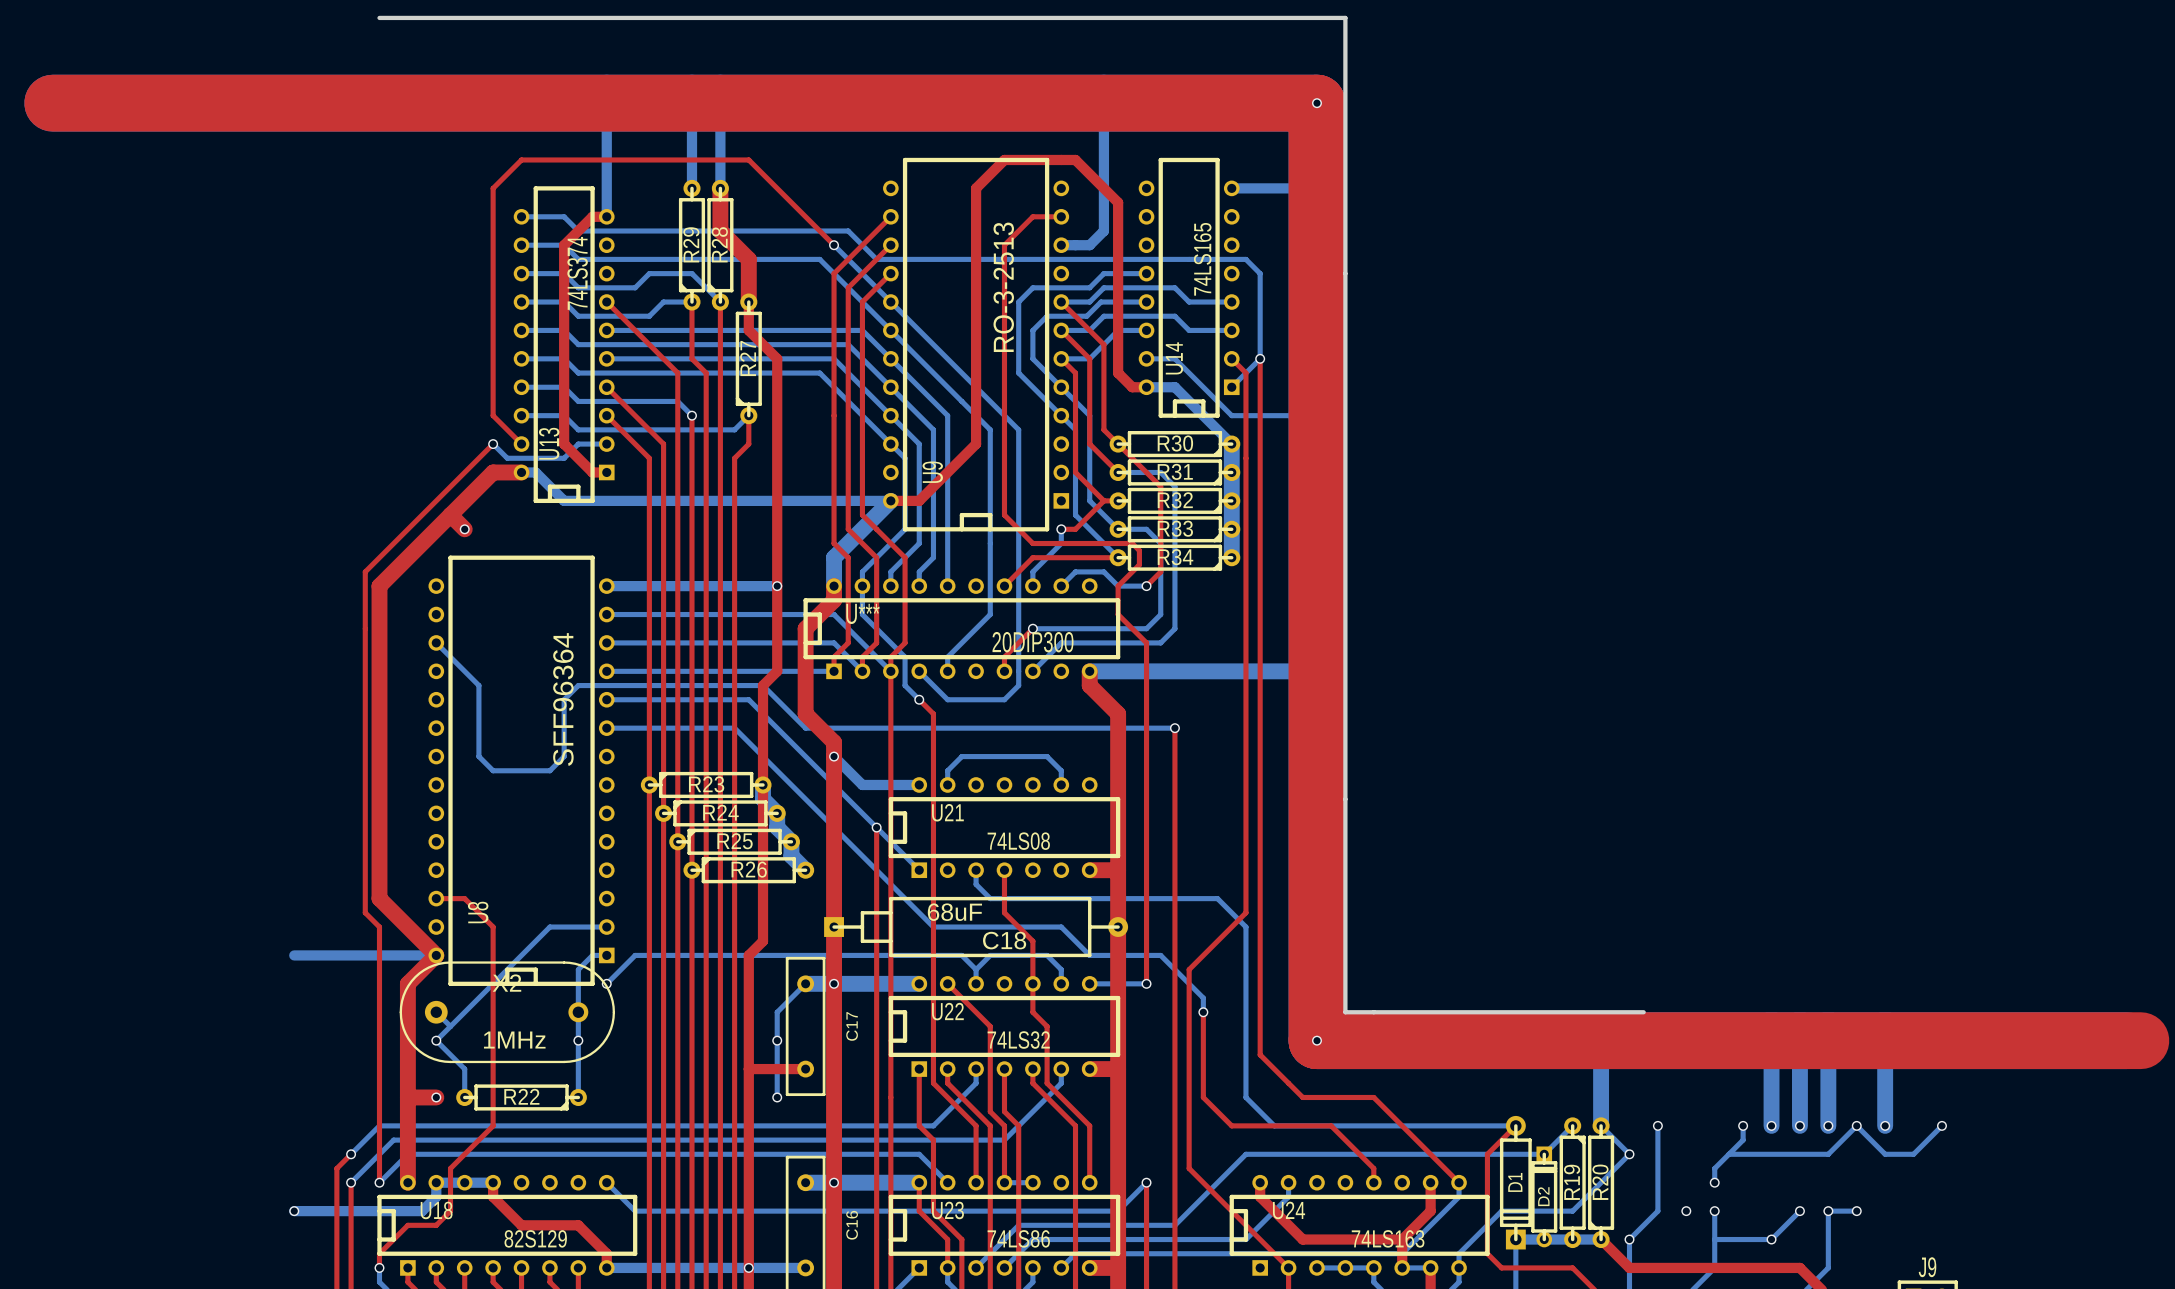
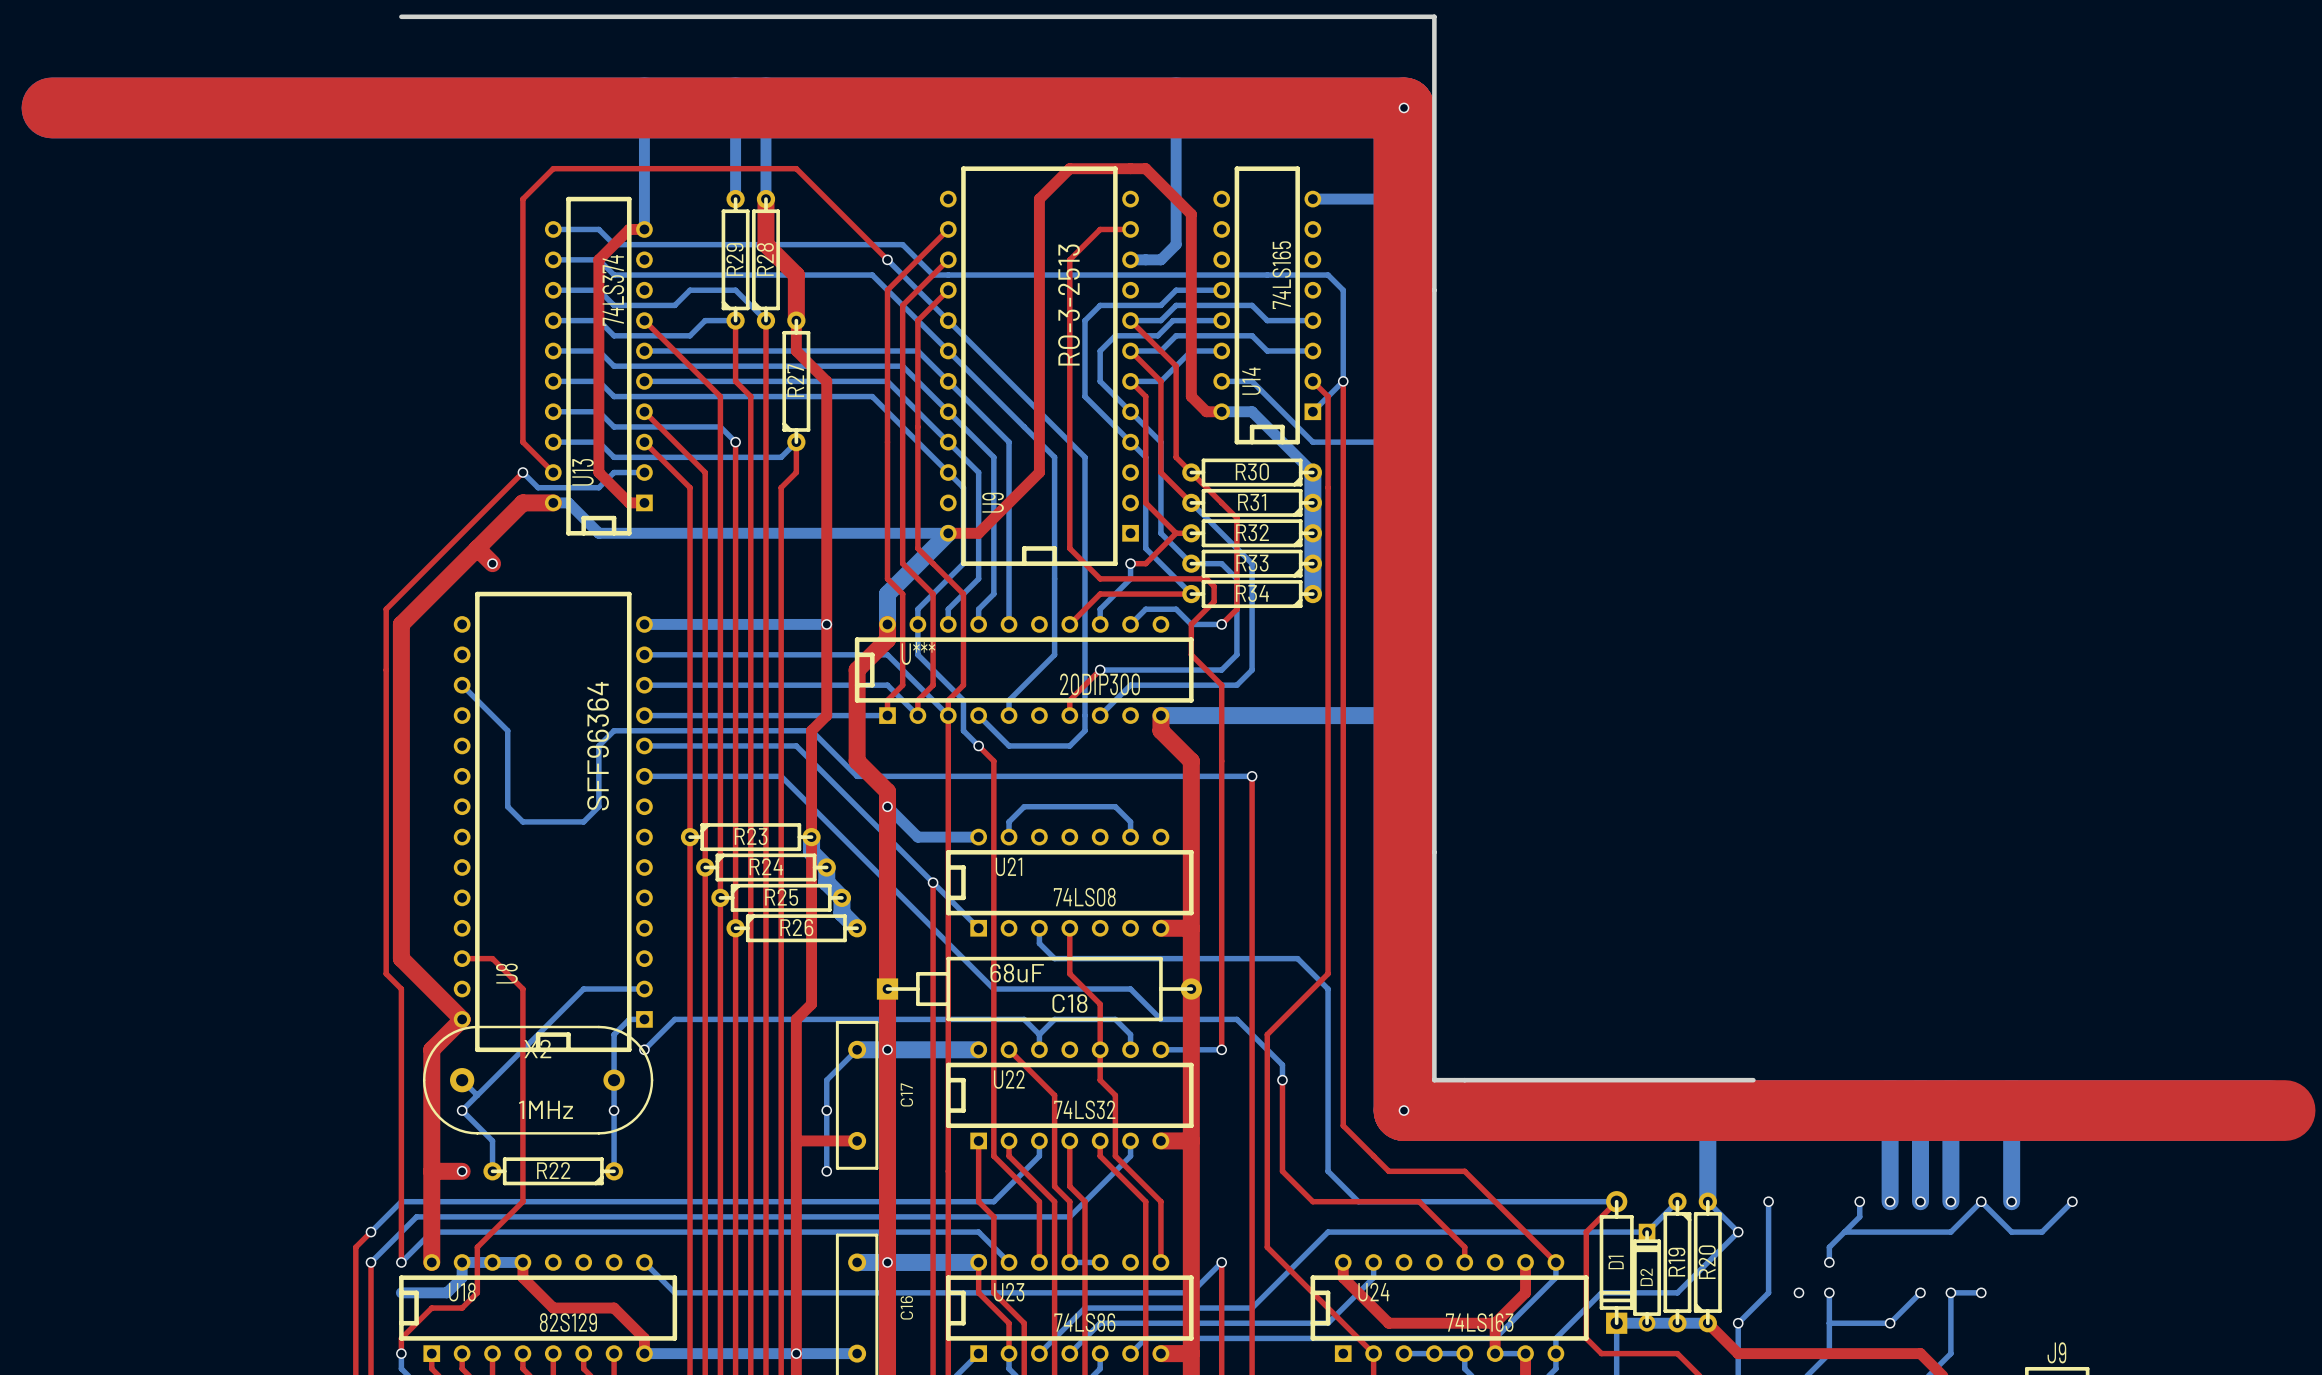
bottom track: (1118, 472) (1160, 472) (1174, 486) (1174, 529) -> (1191, 502) (1252, 563)
bottom track: (294, 955) (436, 955) -> none
bottom track: (294, 1211) (379, 1211) -> none
via: (294, 1211) -> none

